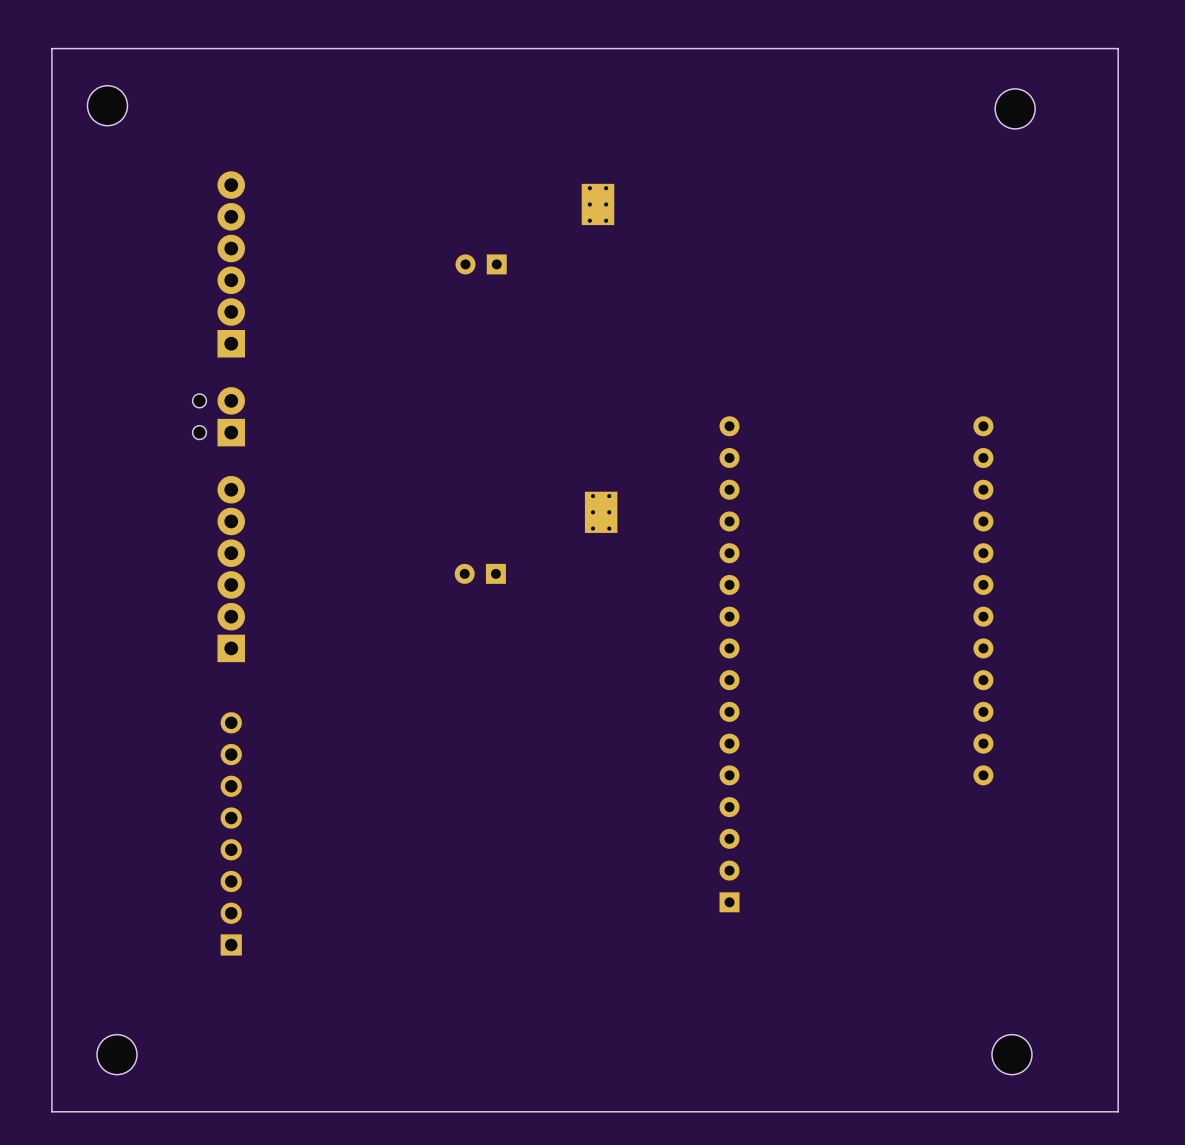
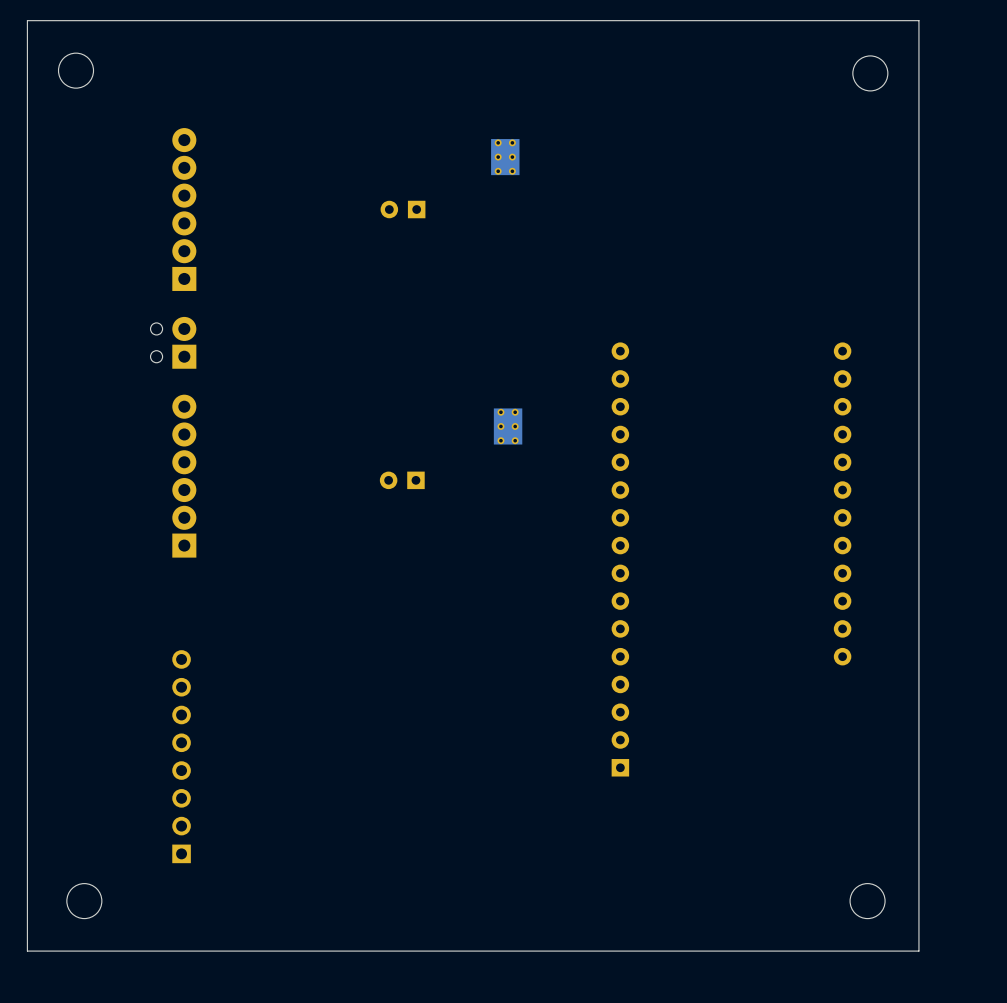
board edge: (1070, 48) (1118, 48) (1118, 1111) (1070, 1111) -> (918, 20) (918, 951)
part position: (231, 833) -> (181, 756)

